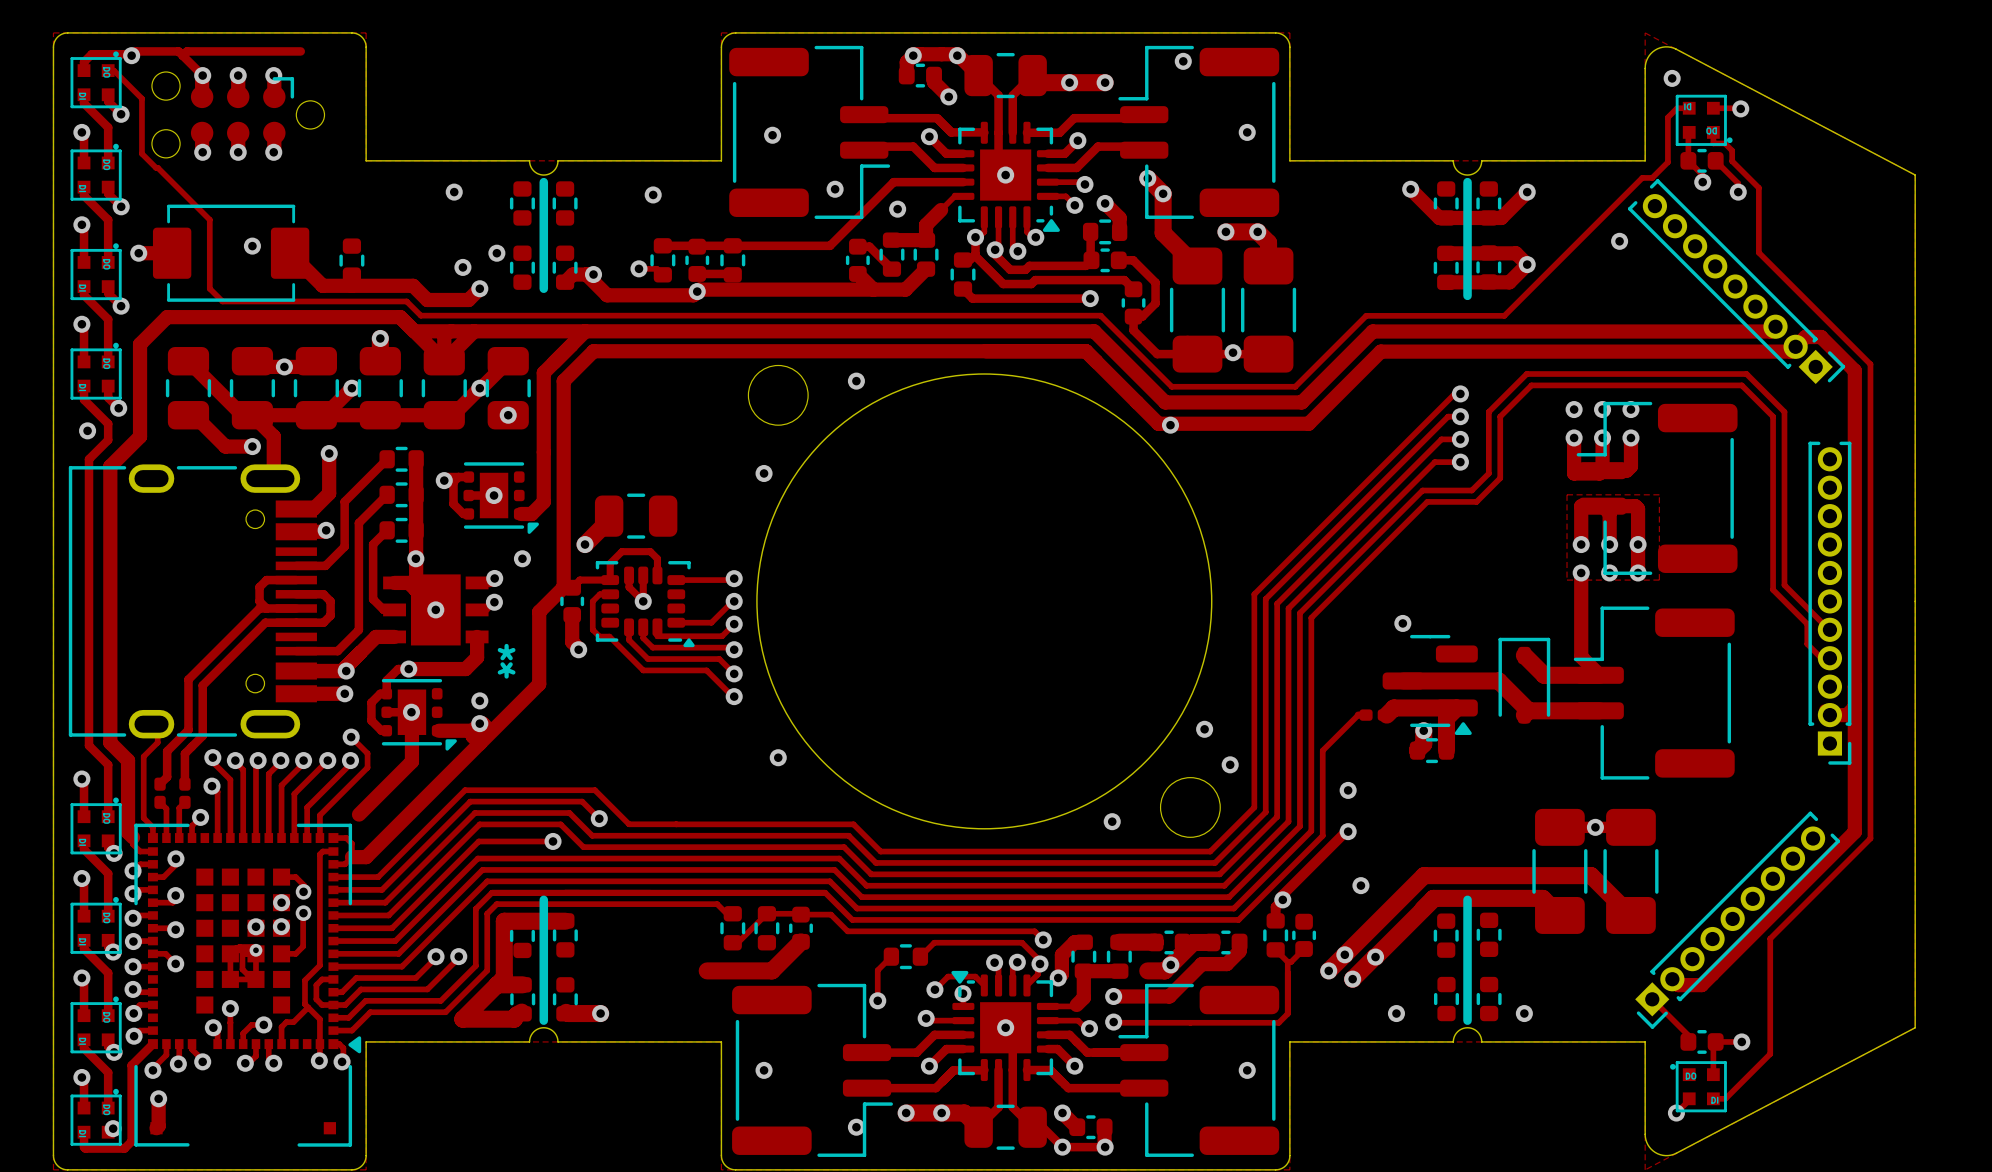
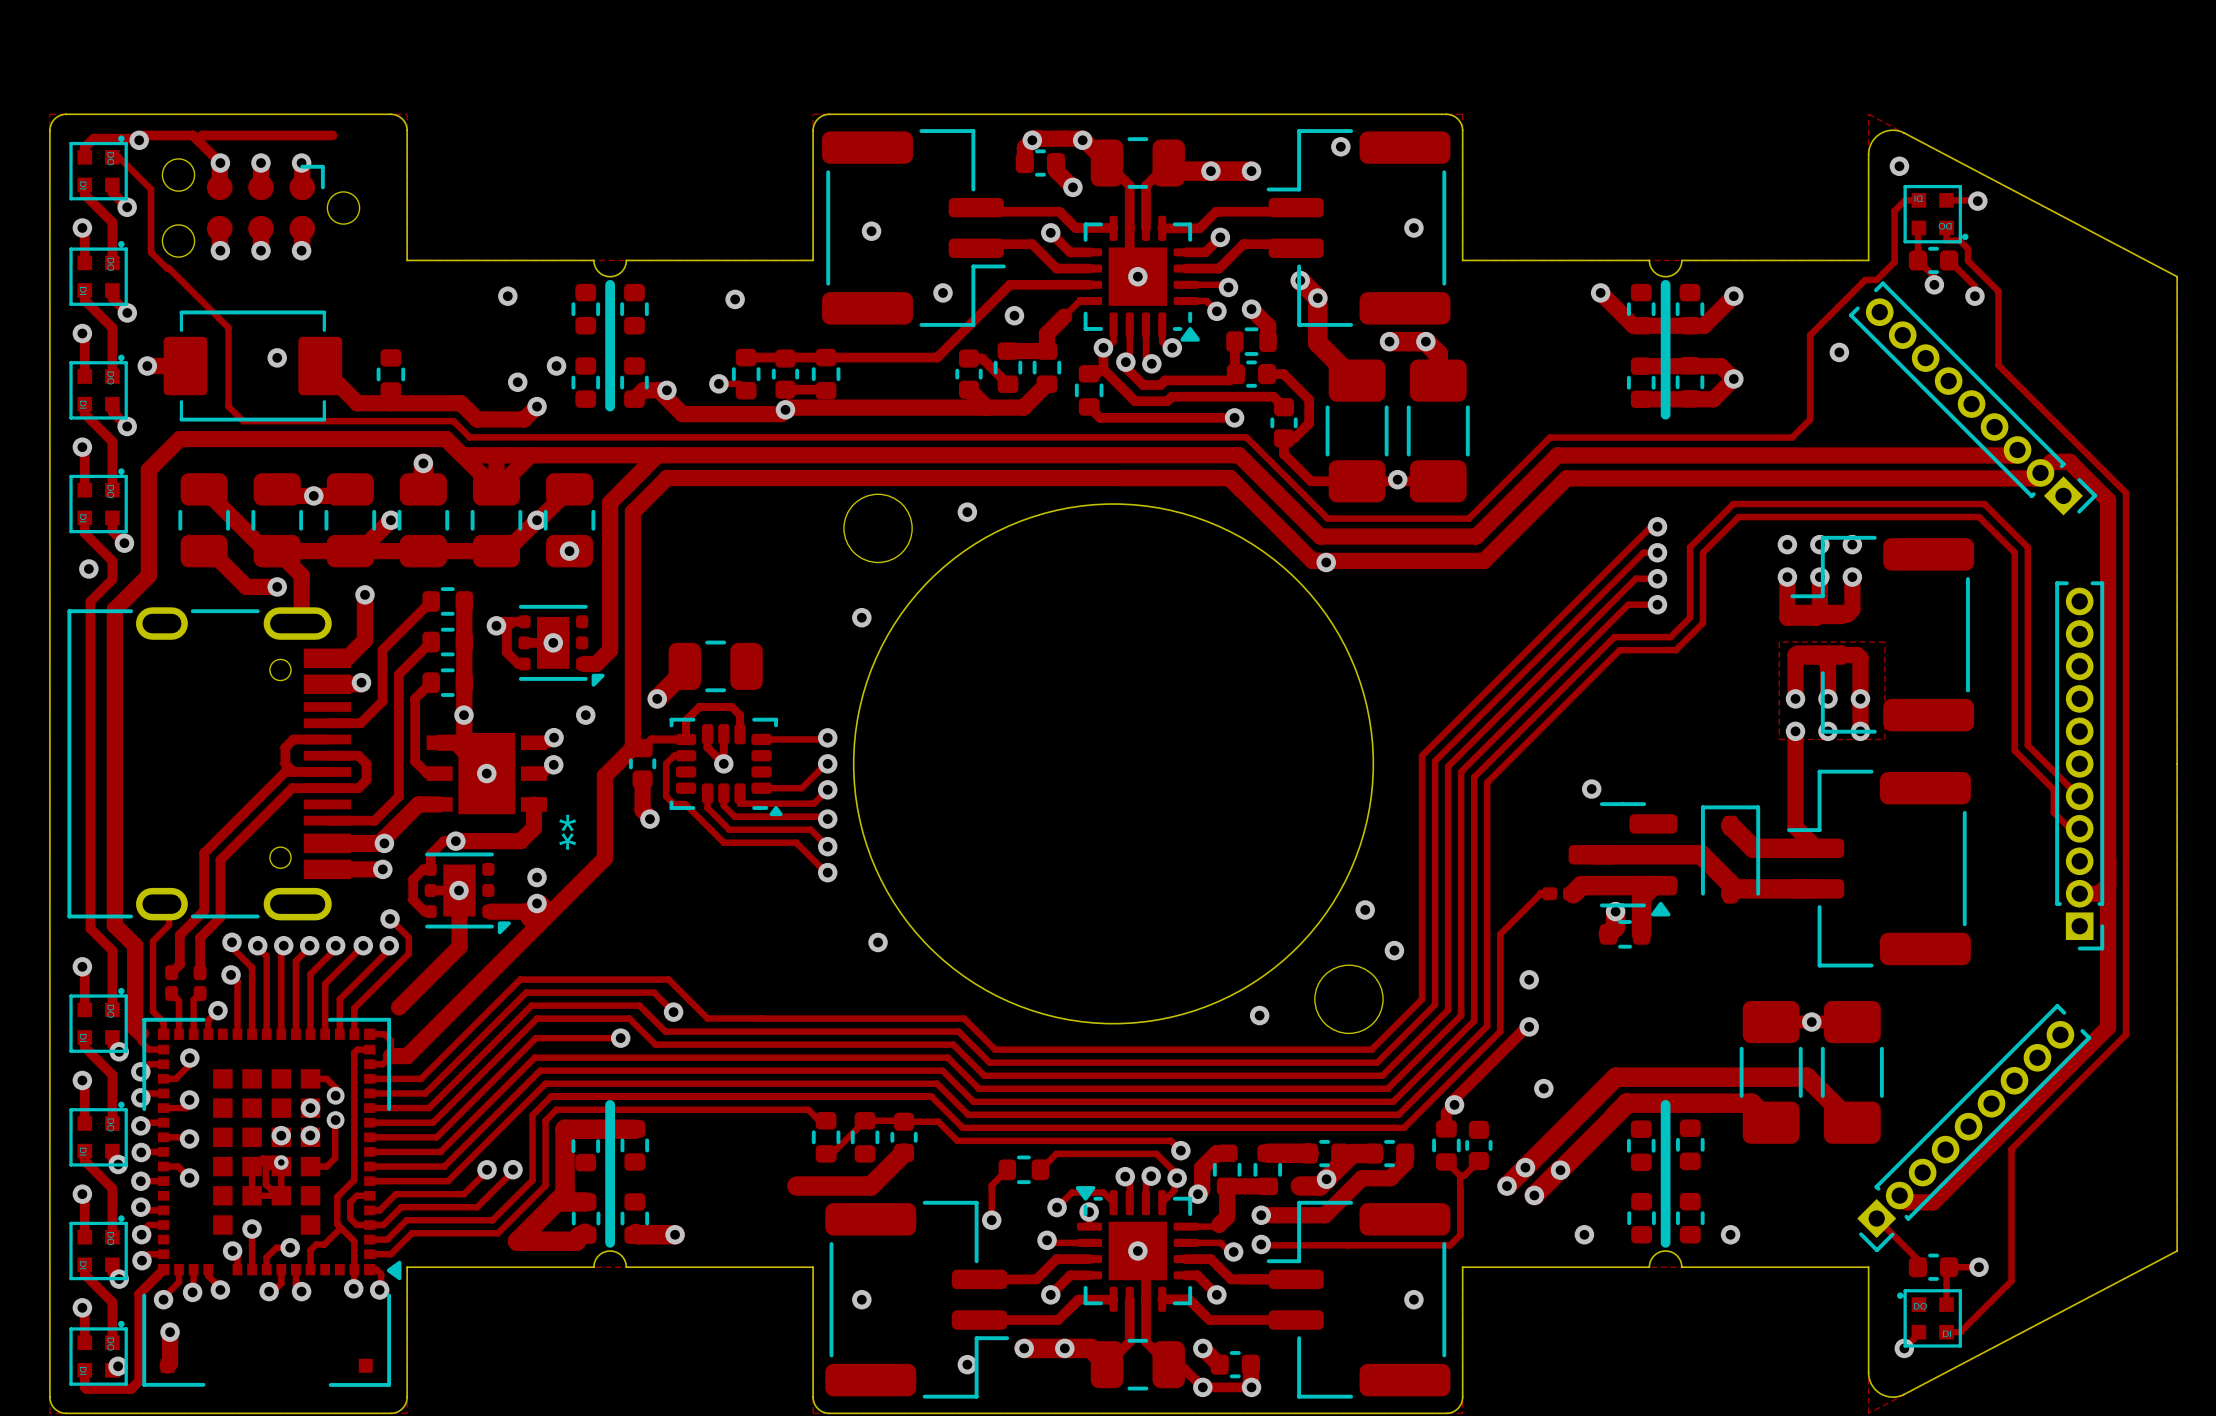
track: (1594, 226) (1504, 315) -> (1810, 335) (1810, 419) (1792, 437) (1707, 437)

